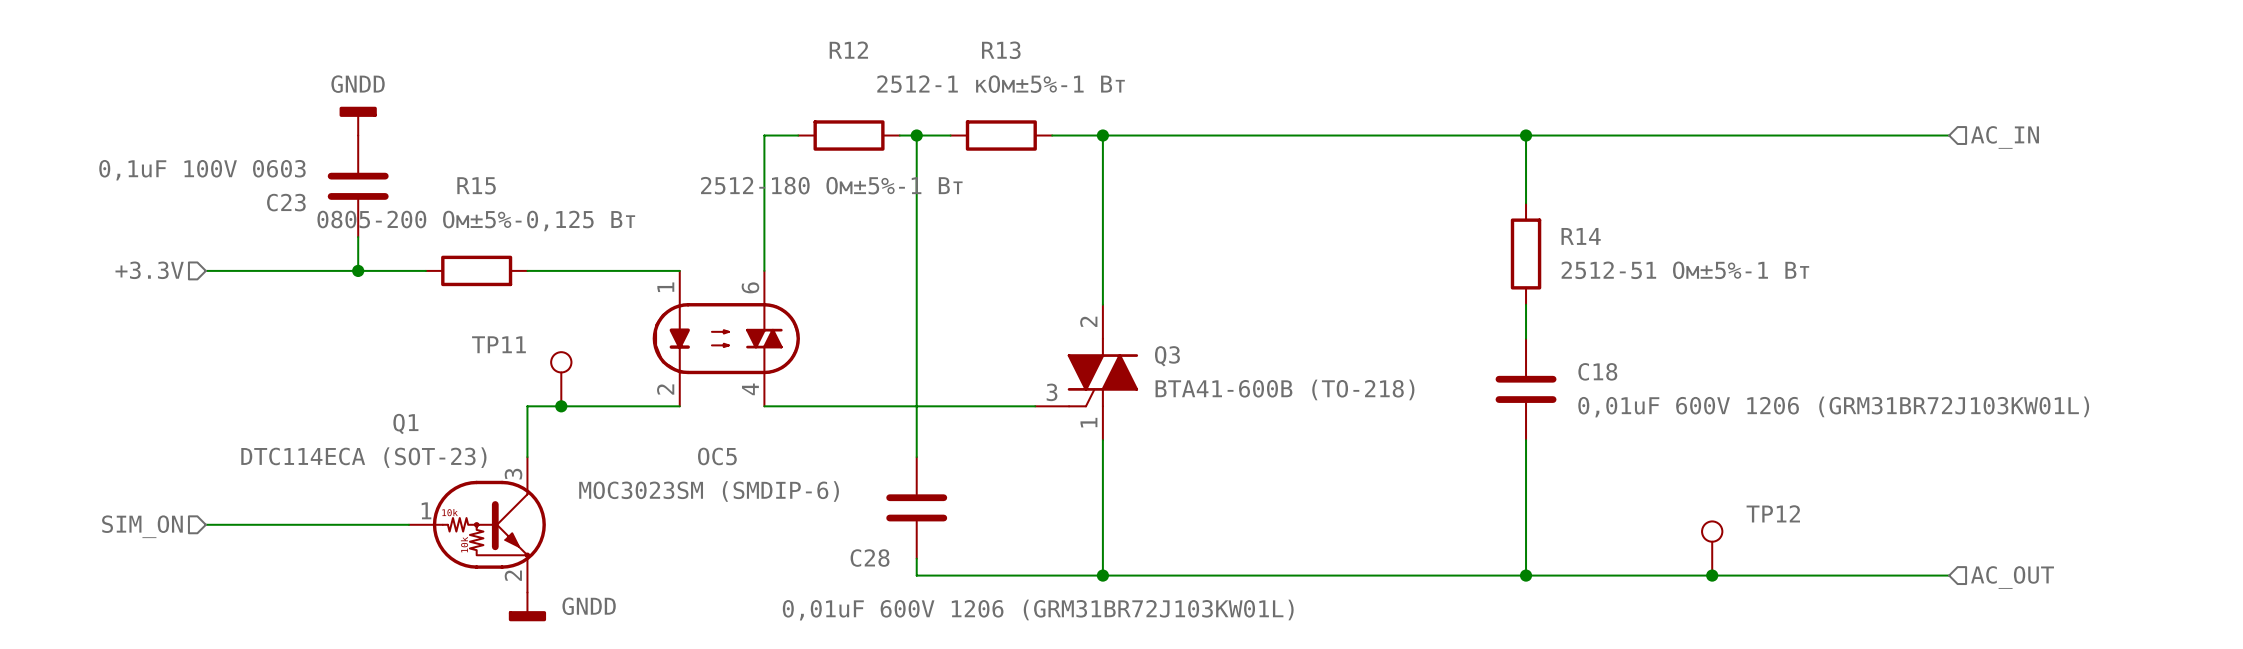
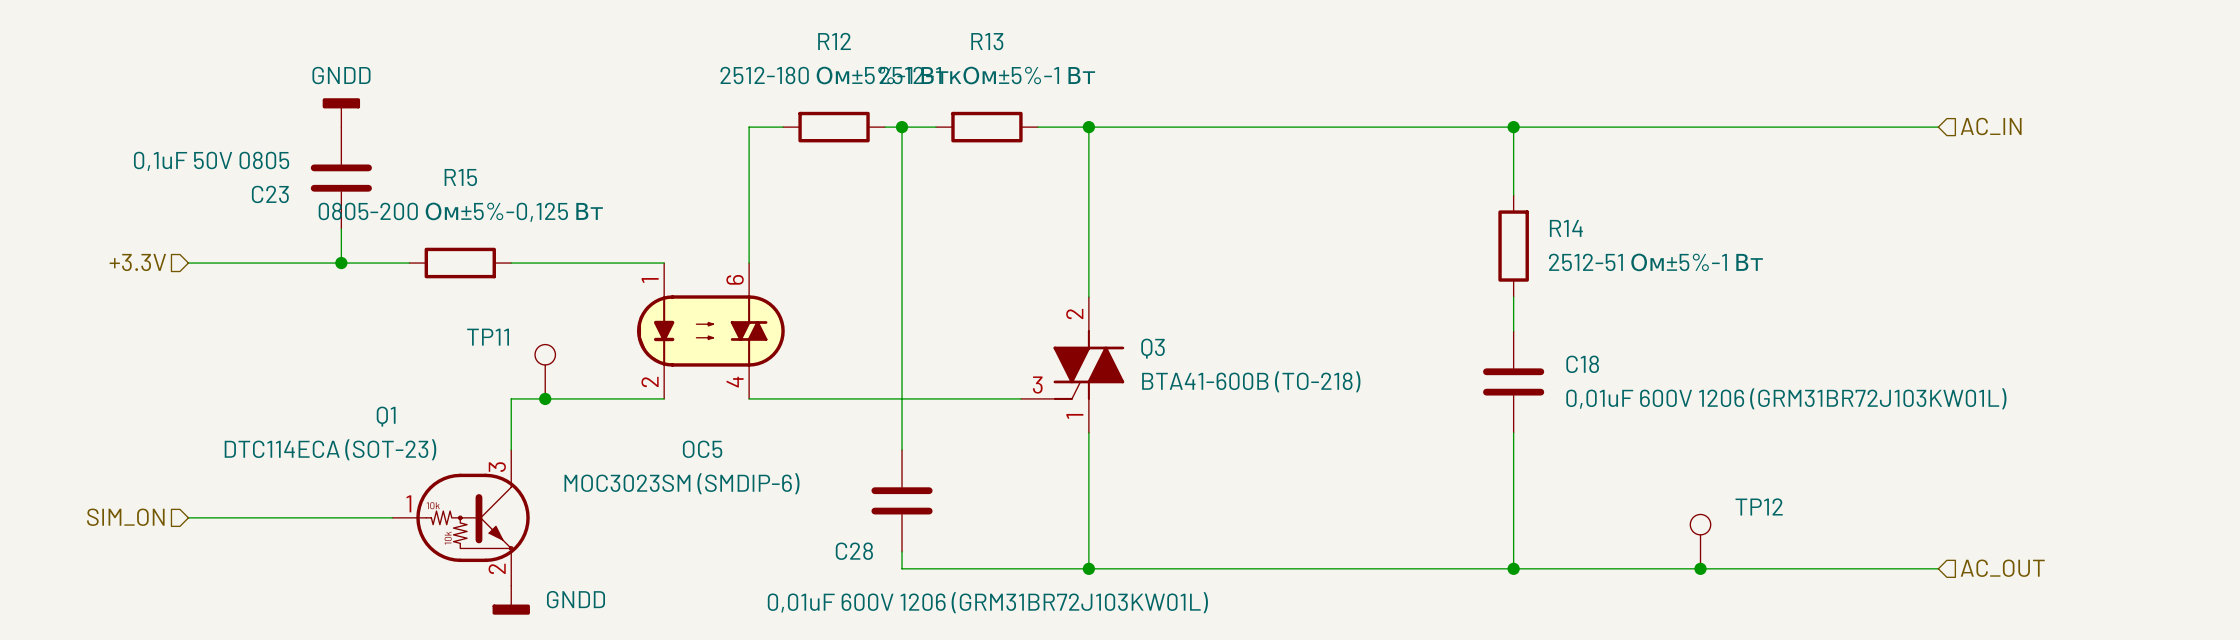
C23 value: 0,1uF 100V 0603 (202, 170) -> 0,1uF 50V 0805 (211, 161)
R12 value position: 2512-180 Ом±5%-1 Вт (831, 185) -> 2512-180 Ом±5%-1 Вт (834, 75)

